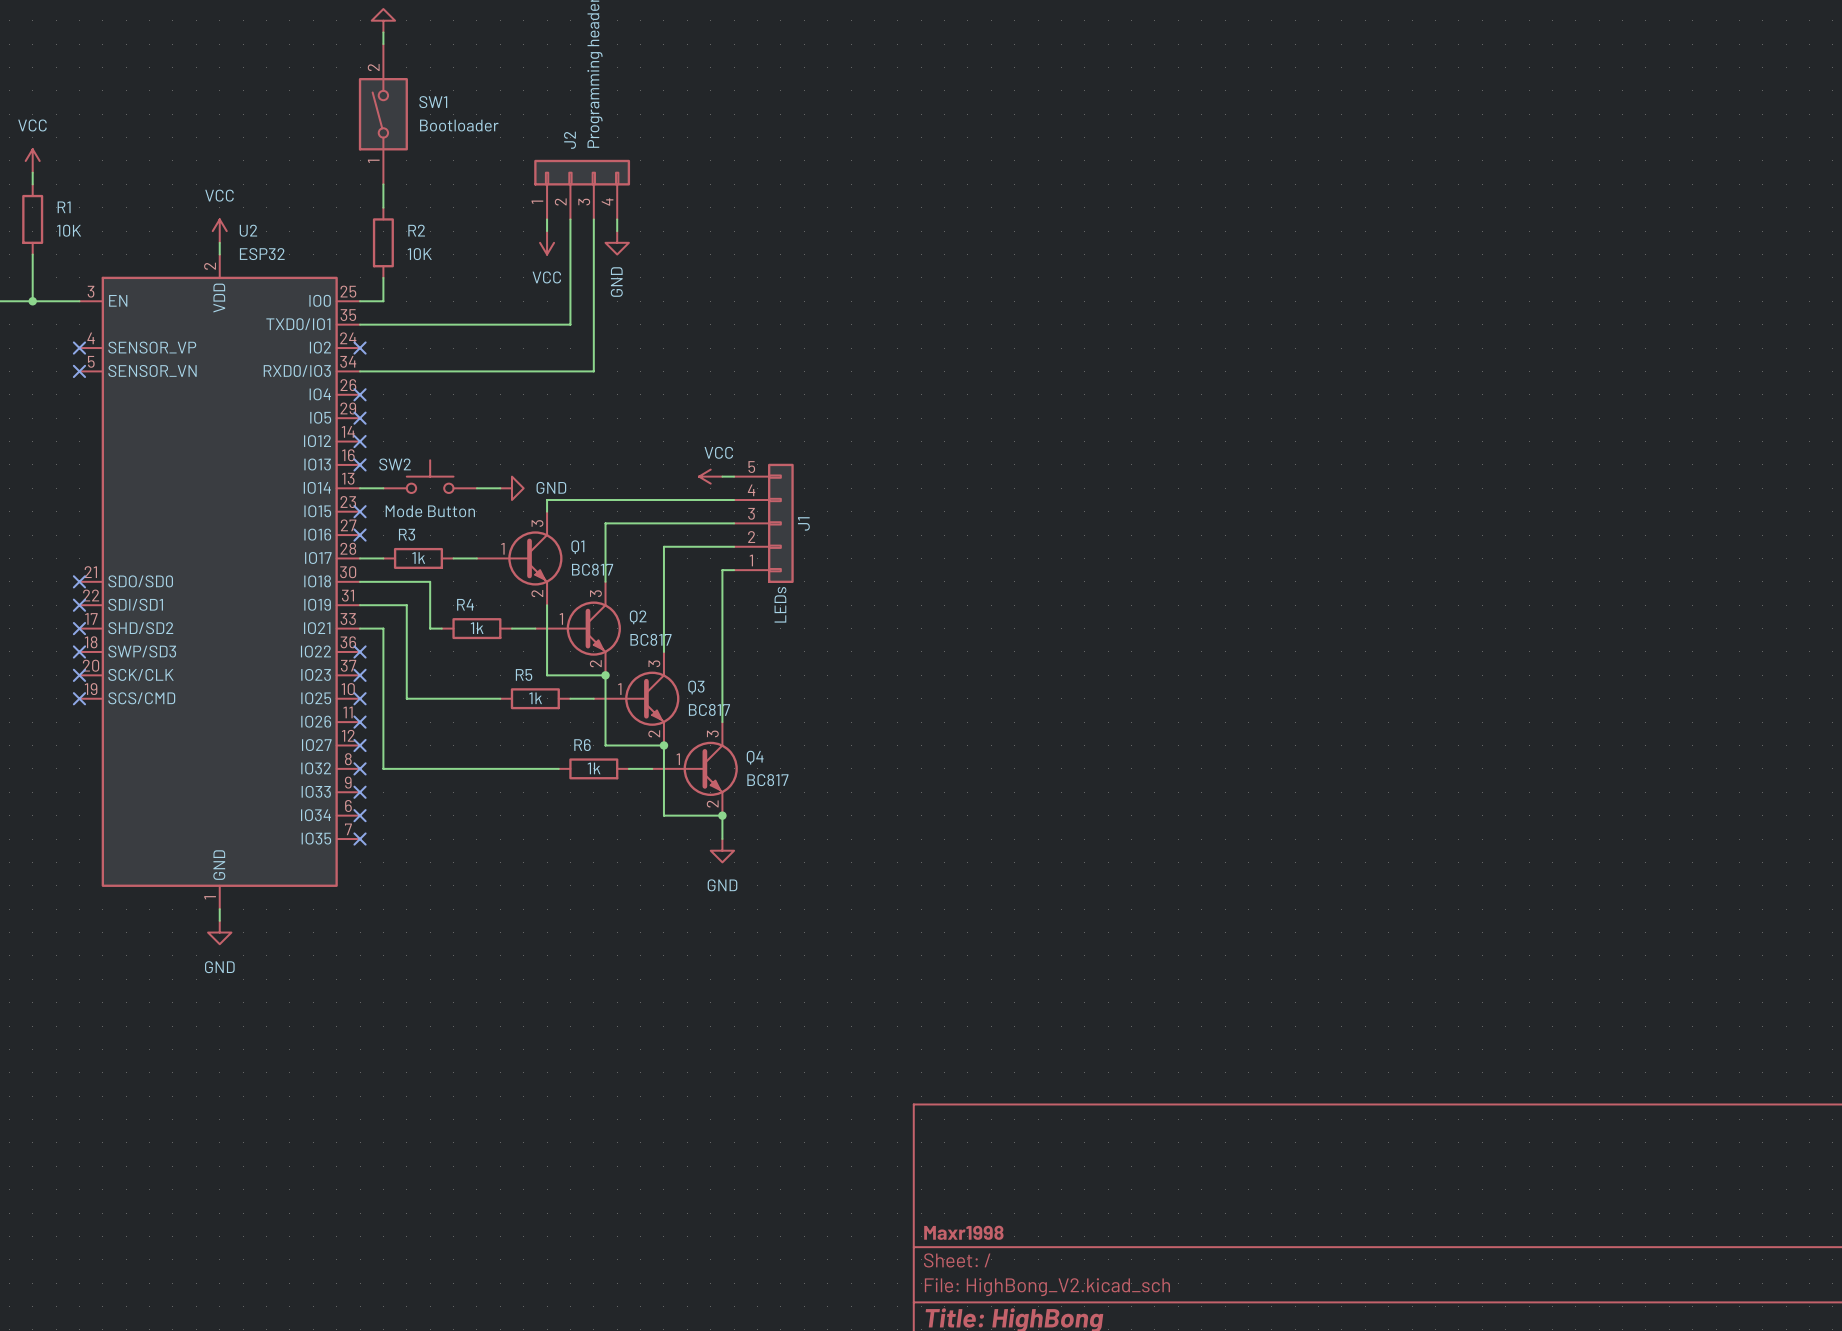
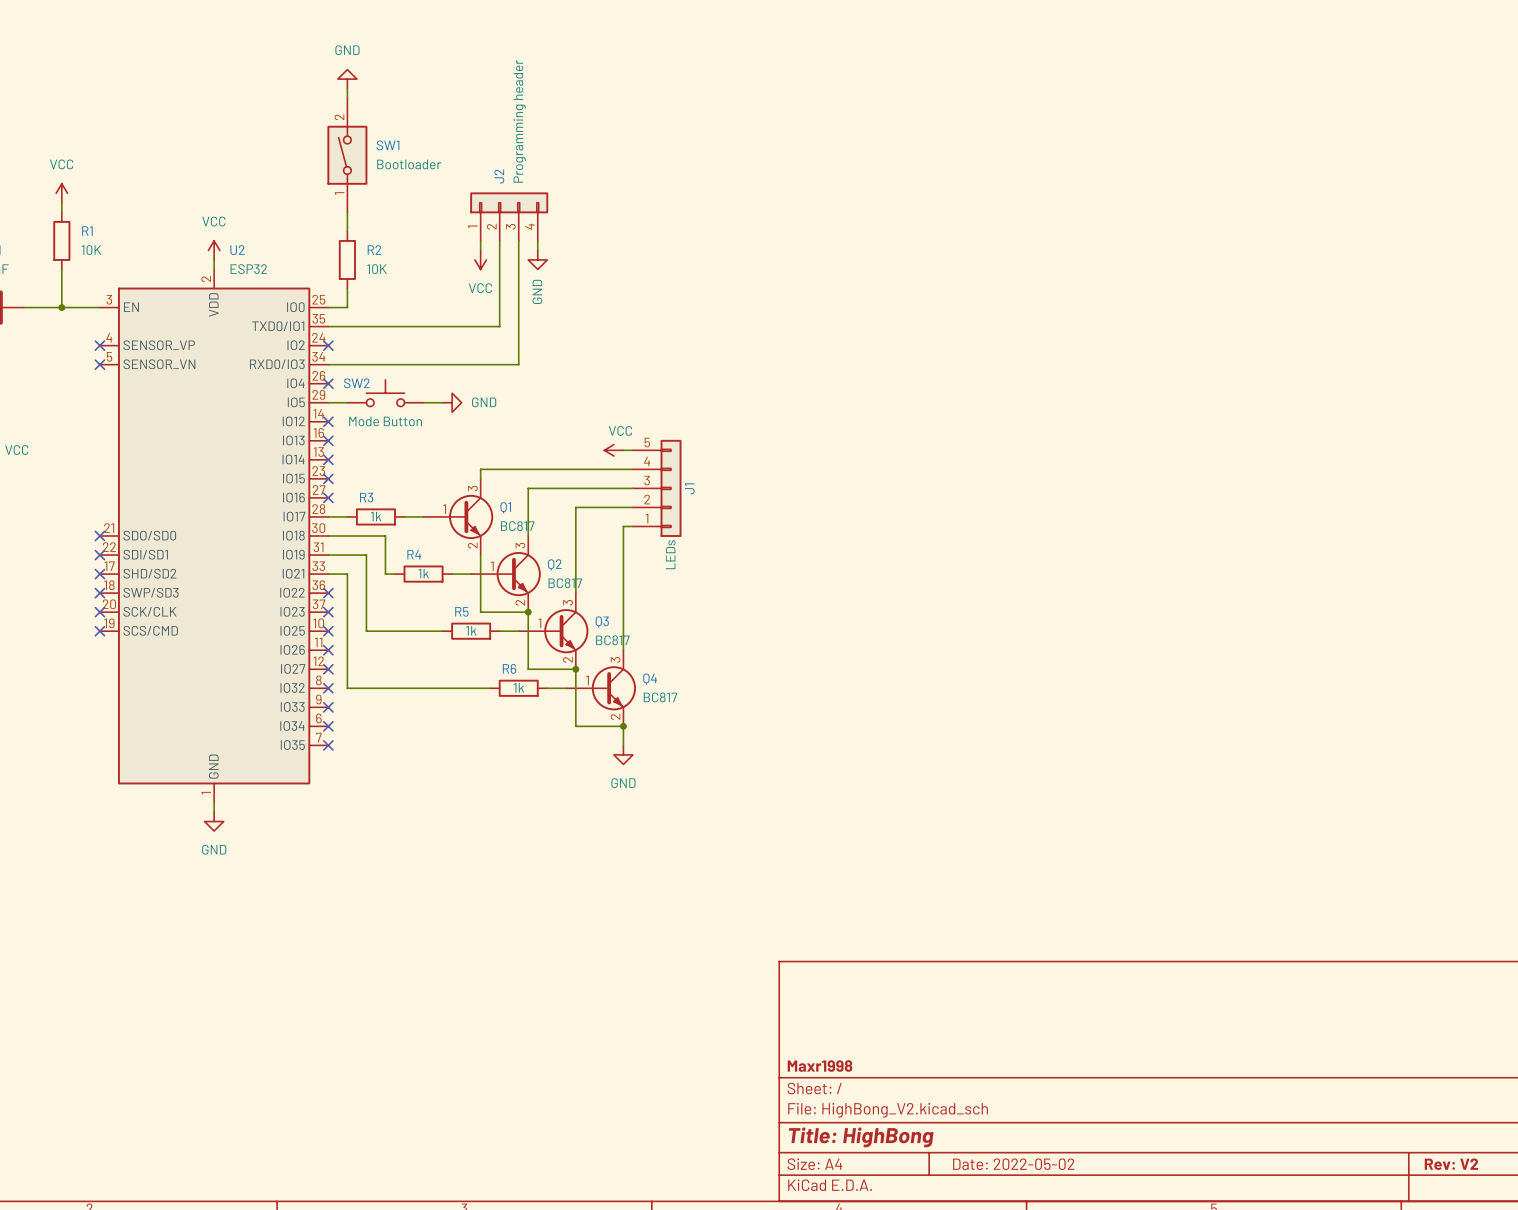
no-connect mark: (360, 418) -> none
SW2 position: (430, 476) -> (385, 393)
wire: (360, 488) (383, 488) -> (328, 402) (347, 402)
no-connect mark: none -> (328, 459)
wire: (476, 488) (500, 488) -> (423, 402) (442, 402)
power symbol position: GND (511, 488) -> GND (452, 402)

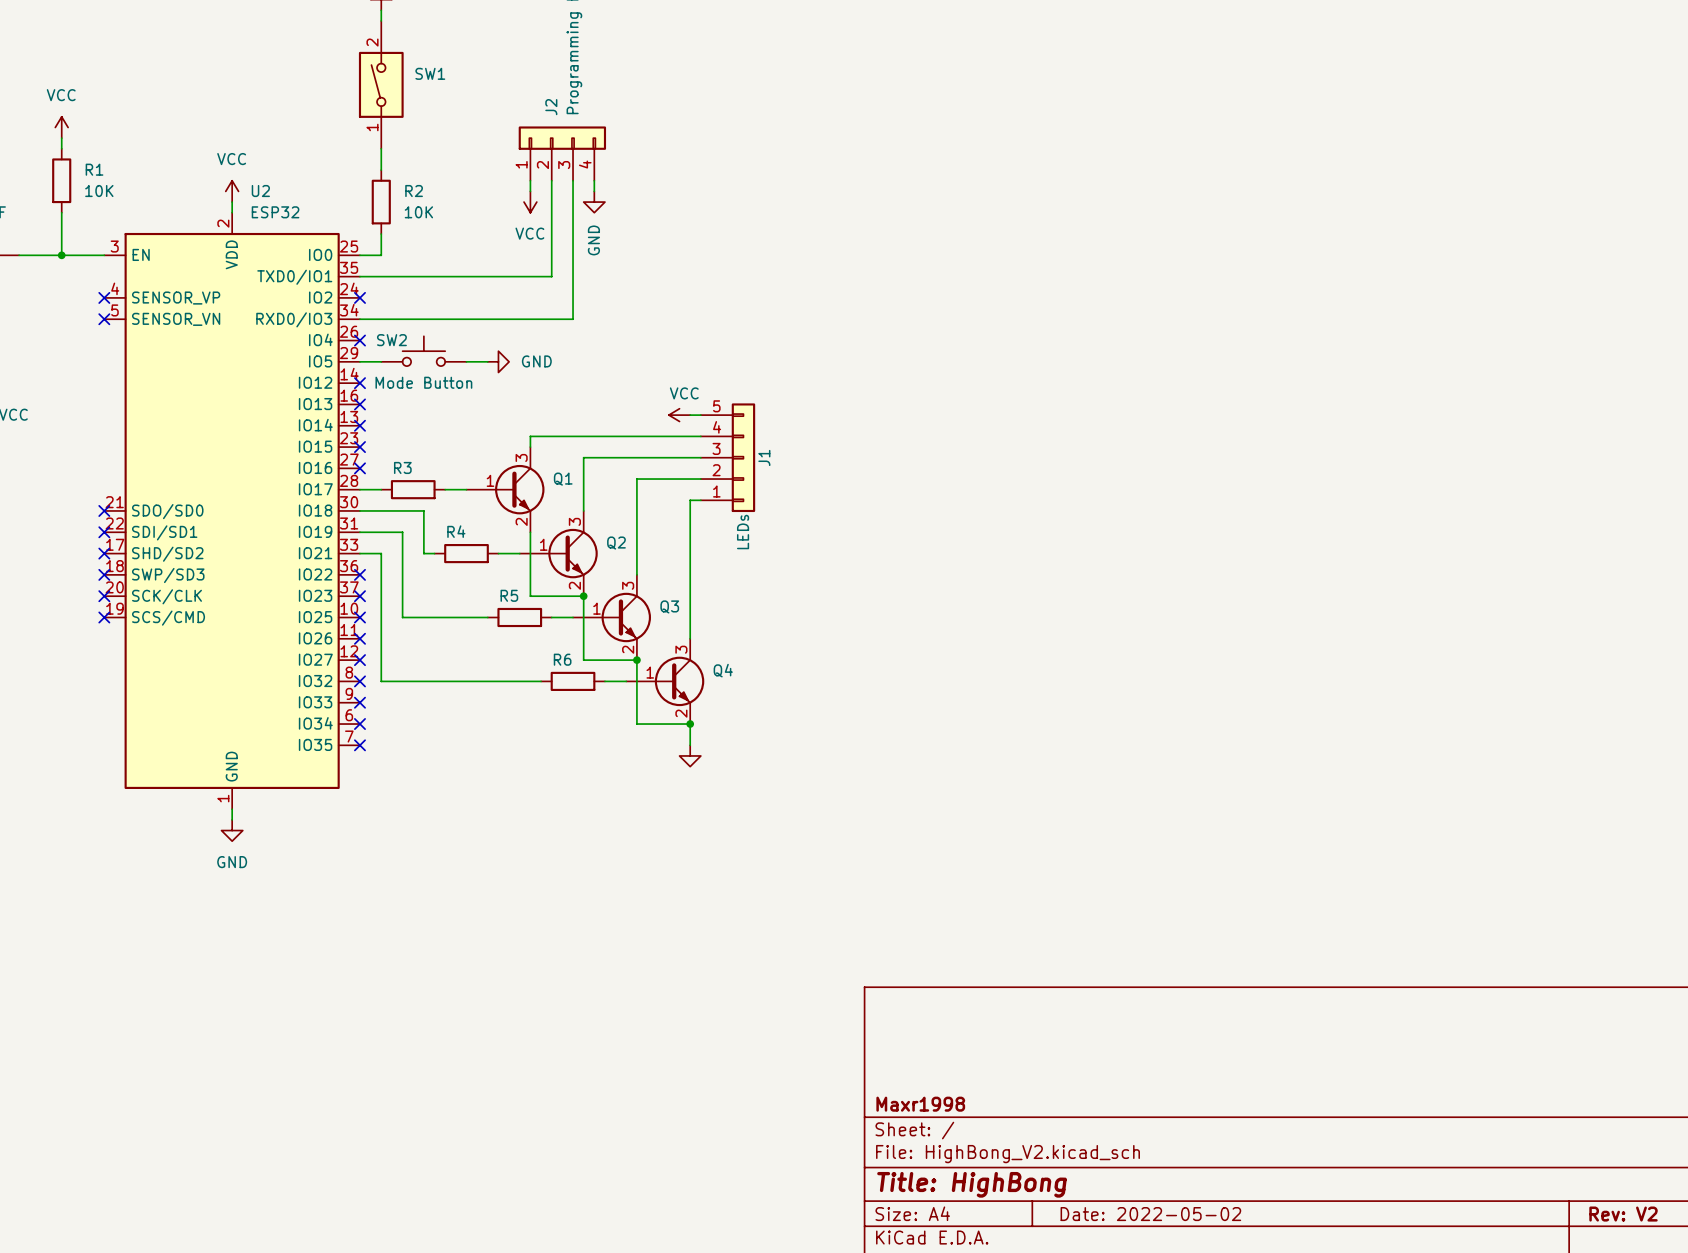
SW1 value: Bootloader (409, 164) -> none
R3 value: 1k (376, 516) -> none
Q1 value: BC817 (517, 526) -> none
R4 value: 1k (423, 573) -> none
Q2 value: BC817 (565, 583) -> none
R5 value: 1k (471, 630) -> none
Q3 value: BC817 (612, 640) -> none
R6 value: 1k (518, 687) -> none
Q4 value: BC817 (660, 697) -> none
power symbol text: GND (623, 783) -> none

